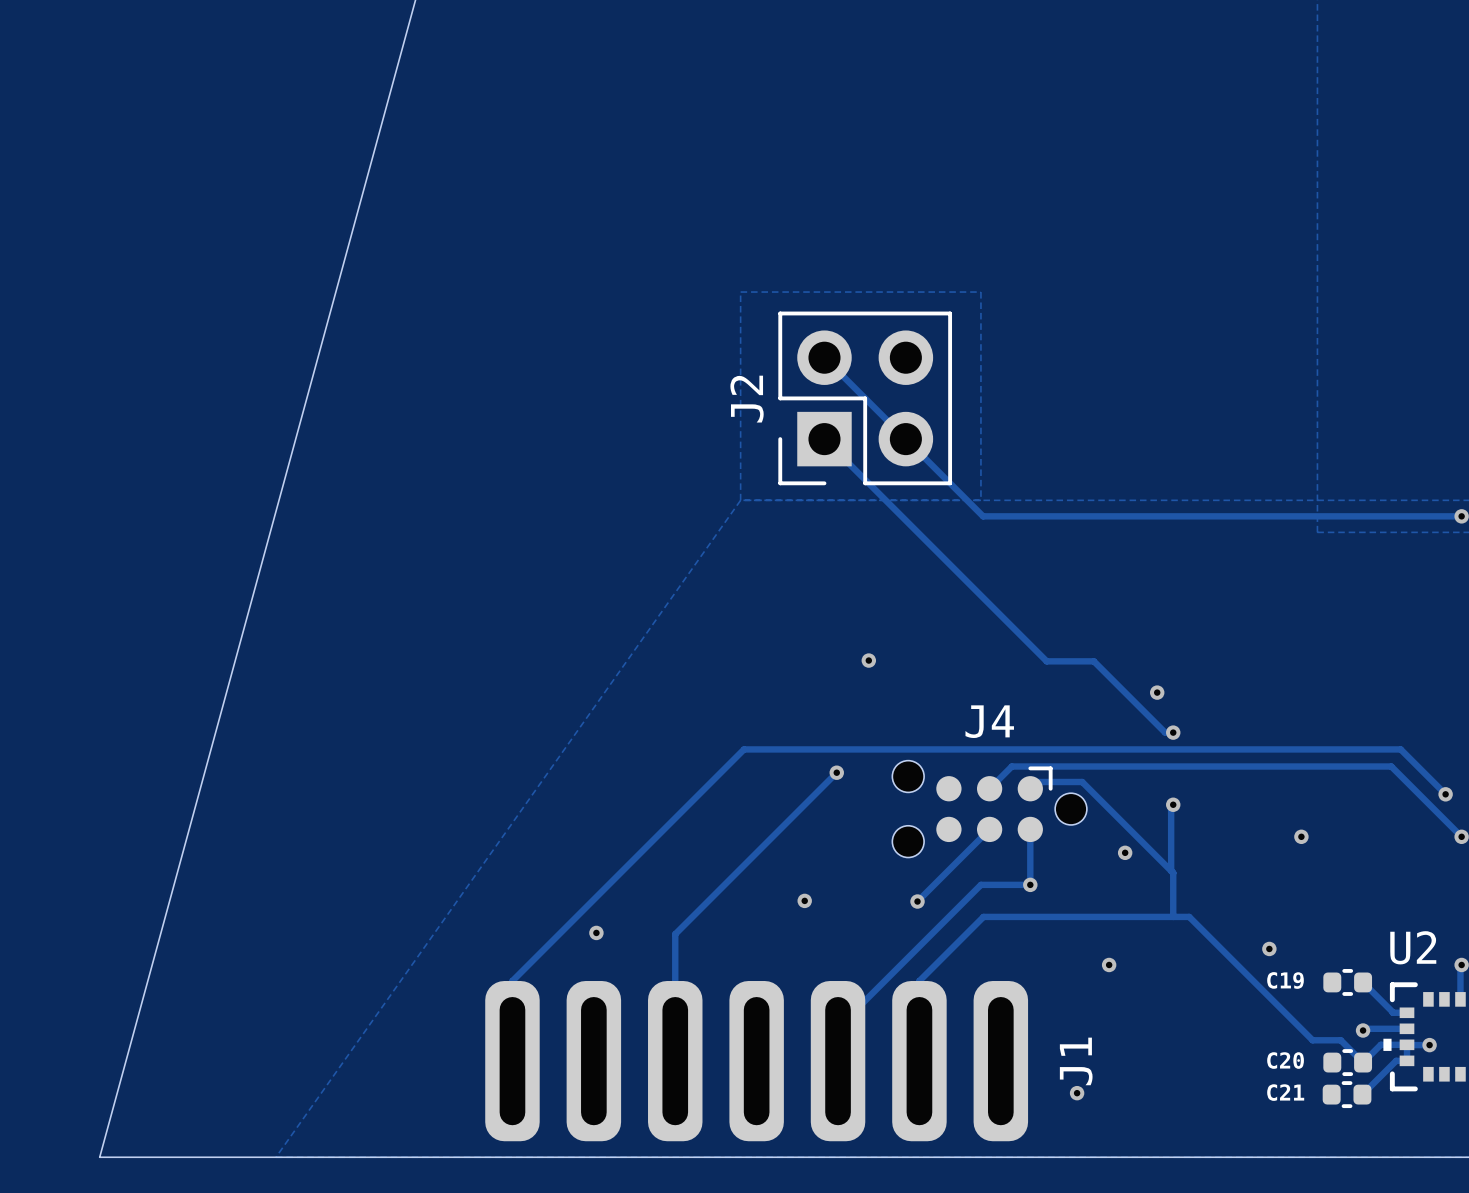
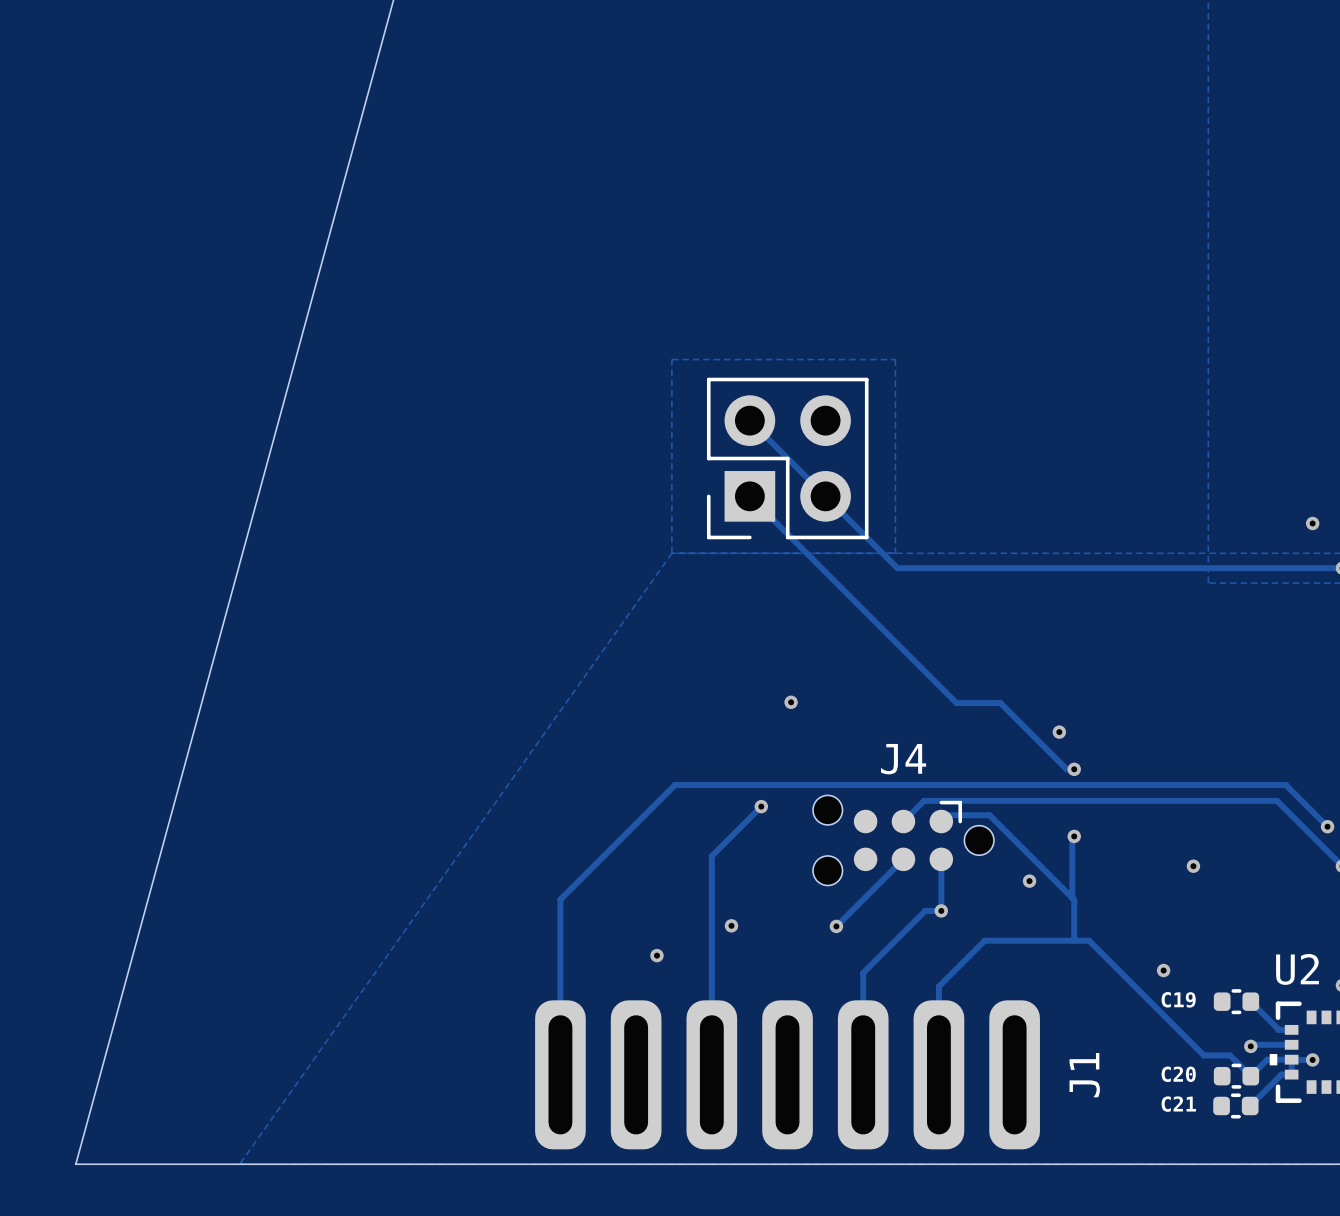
J2 name: J2 (747, 399) -> none
via: none -> (1312, 523)
track: (783, 825) (675, 934) (675, 1061) -> (711, 856) (711, 1074)
track: (620, 872) (512, 981) (512, 1061) -> (560, 899) (560, 1074)
track: (1013, 884) (980, 884) (838, 1027) (838, 1061) -> (925, 910) (863, 972) (863, 1074)
track: (1077, 916) (983, 916) (919, 981) (919, 1061) -> (984, 940) (938, 986) (938, 1074)
via position: (596, 932) -> (656, 955)
via: (1109, 964) -> none
J1 position: (756, 1061) -> (787, 1074)
via: (1077, 1093) -> none

